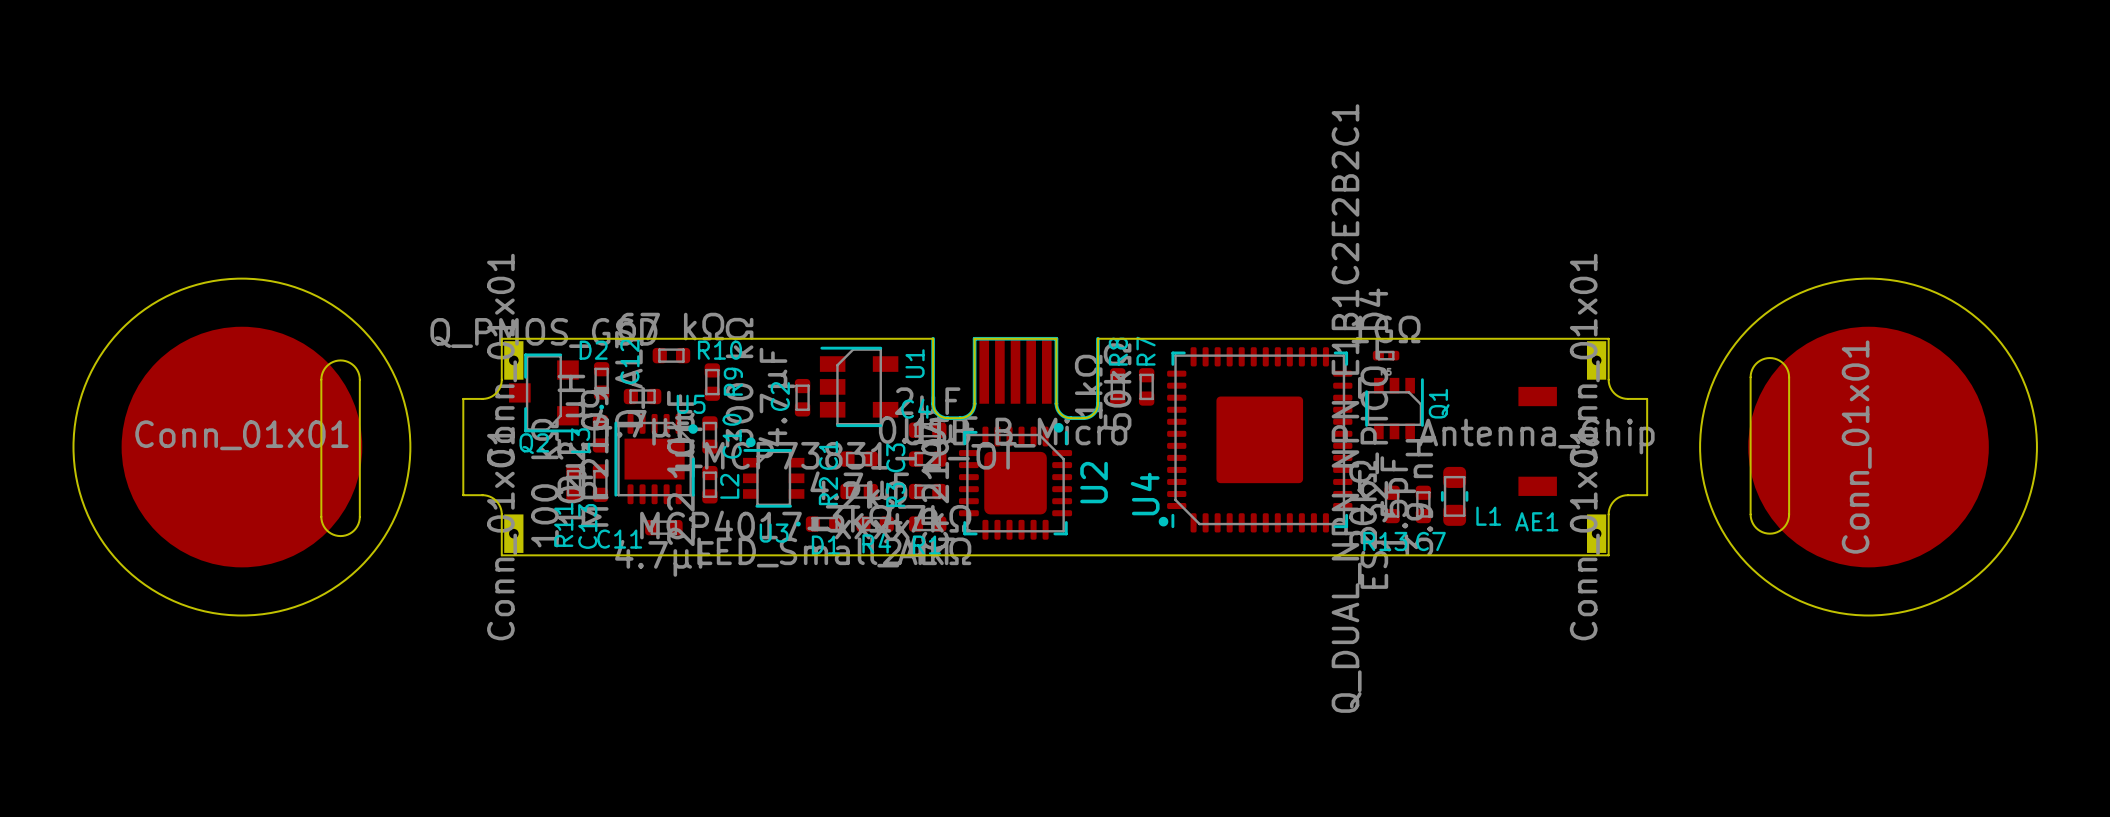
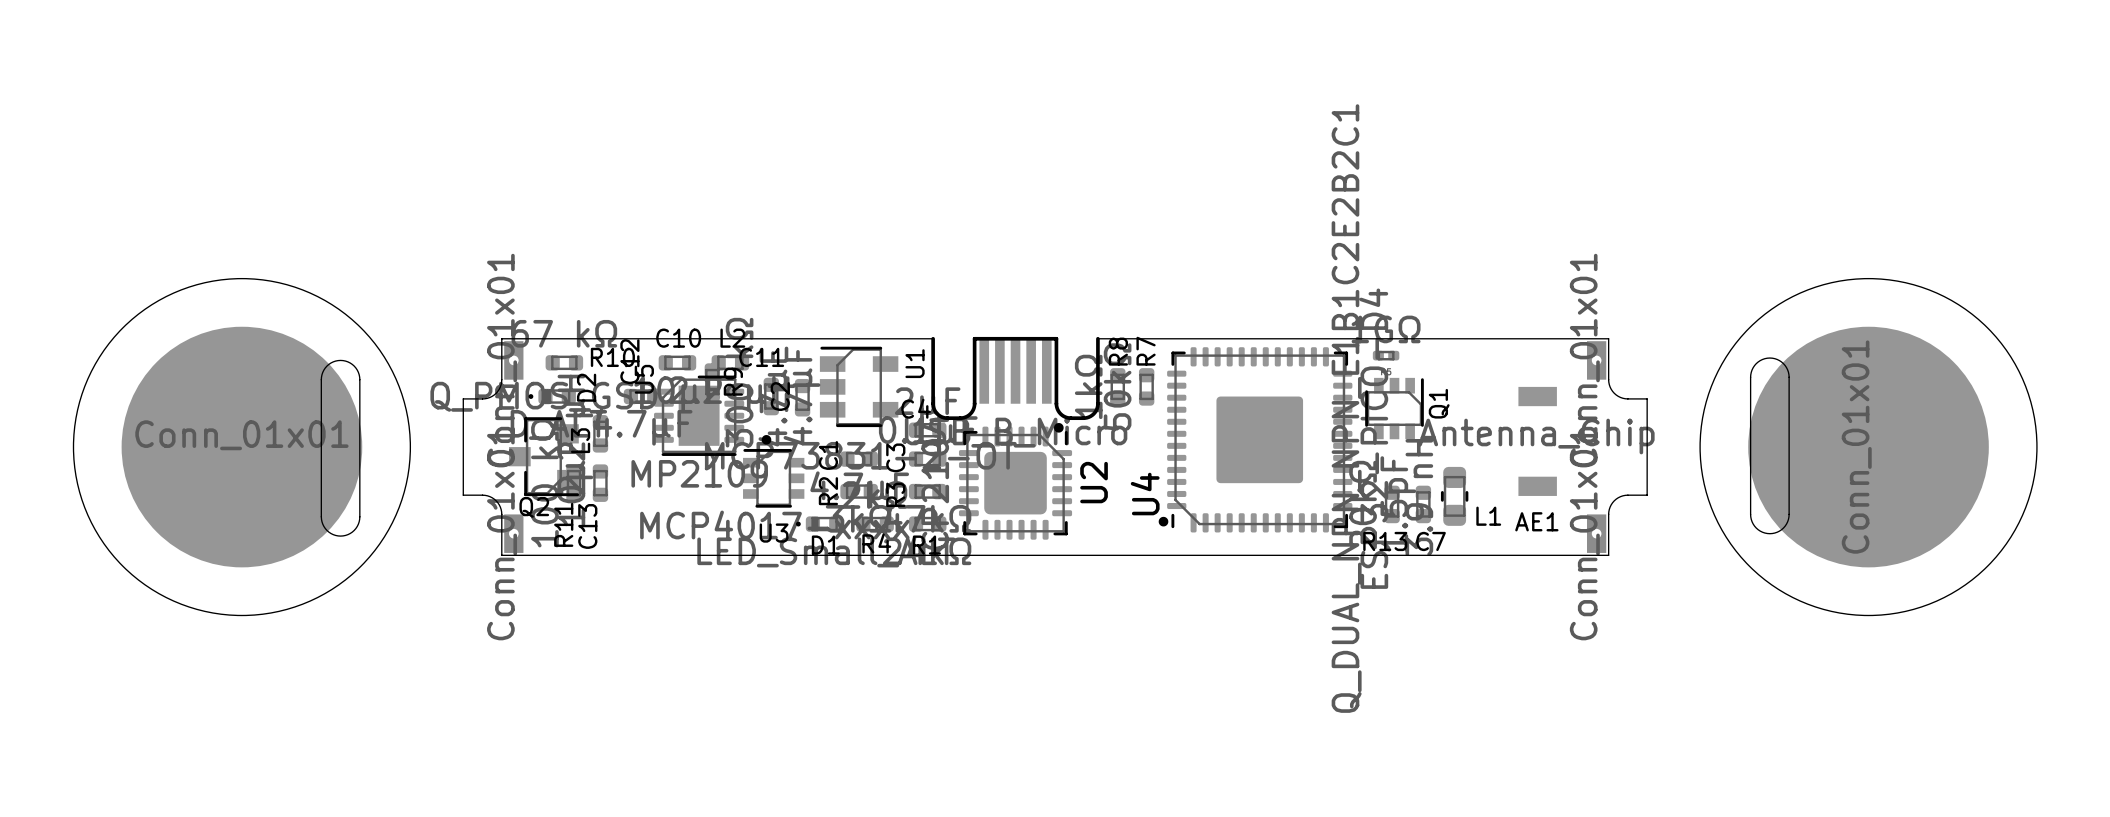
R10 position: (671, 355) -> (564, 362)
D2 rotation: 0° (601, 385) -> 90° clockwise (552, 396)
D2 position: (601, 385) -> (552, 396)
Q2 position: (544, 392) -> (544, 456)
drawing: [688, 424, 698, 434] -> none
C10 rotation: 0° (709, 435) -> 90° clockwise (677, 362)
C10 position: (709, 435) -> (677, 362)
drawing position: (750, 442) -> (766, 439)
U5 rotation: 0° (654, 459) -> 90° counterclockwise (699, 415)
U5 position: (654, 459) -> (699, 415)
L2 rotation: 0° (709, 484) -> 90° clockwise (730, 362)
L2 position: (709, 484) -> (730, 362)
C11 rotation: 0° (663, 527) -> 90° clockwise (771, 396)
C11 position: (663, 527) -> (771, 396)

